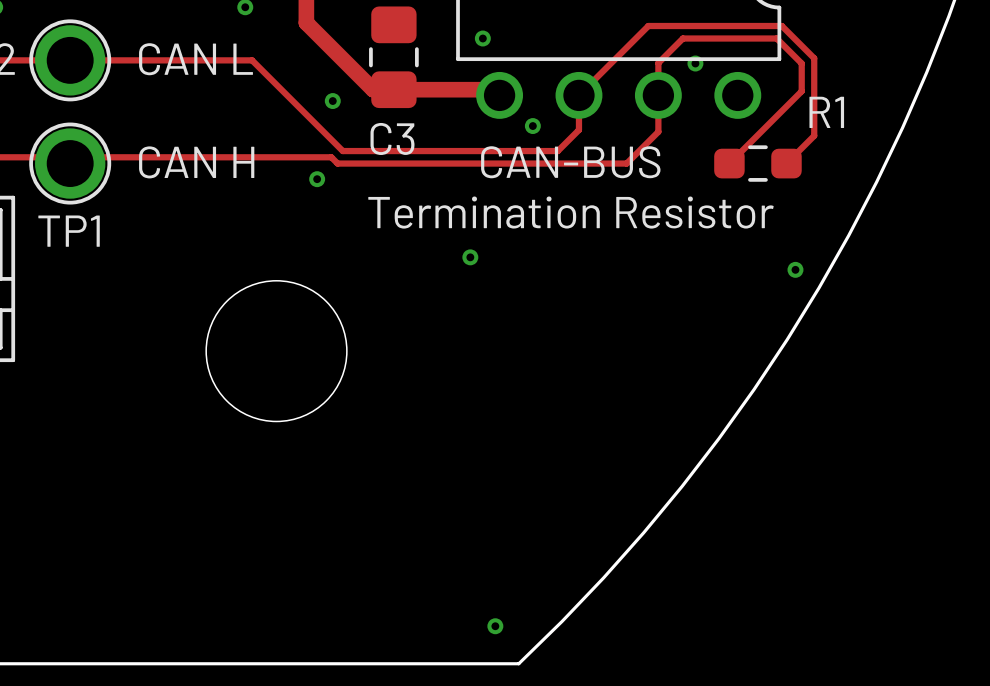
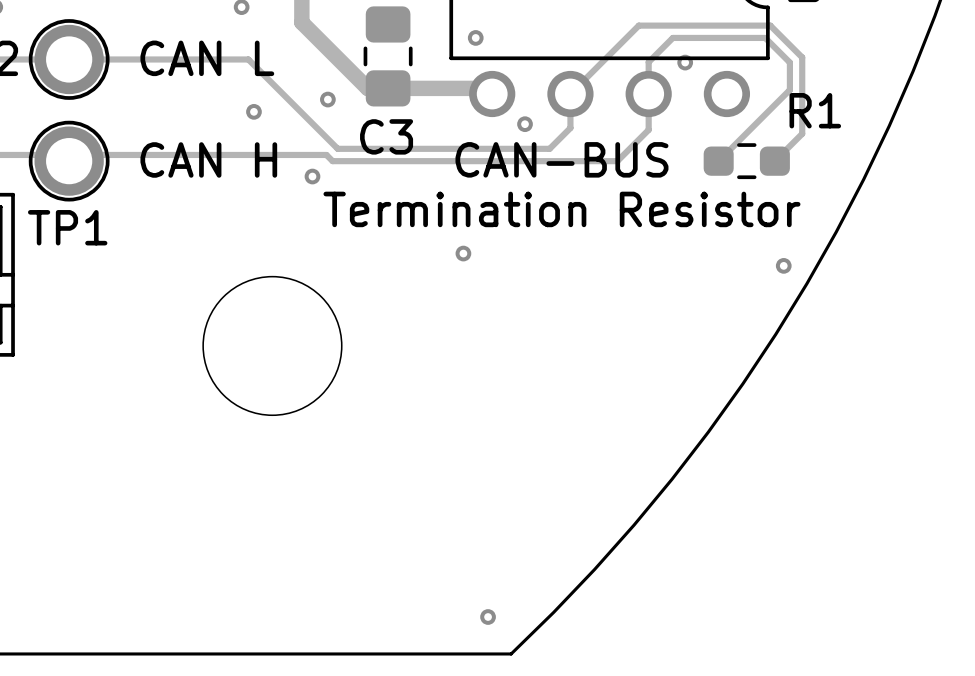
via: none -> (253, 111)

